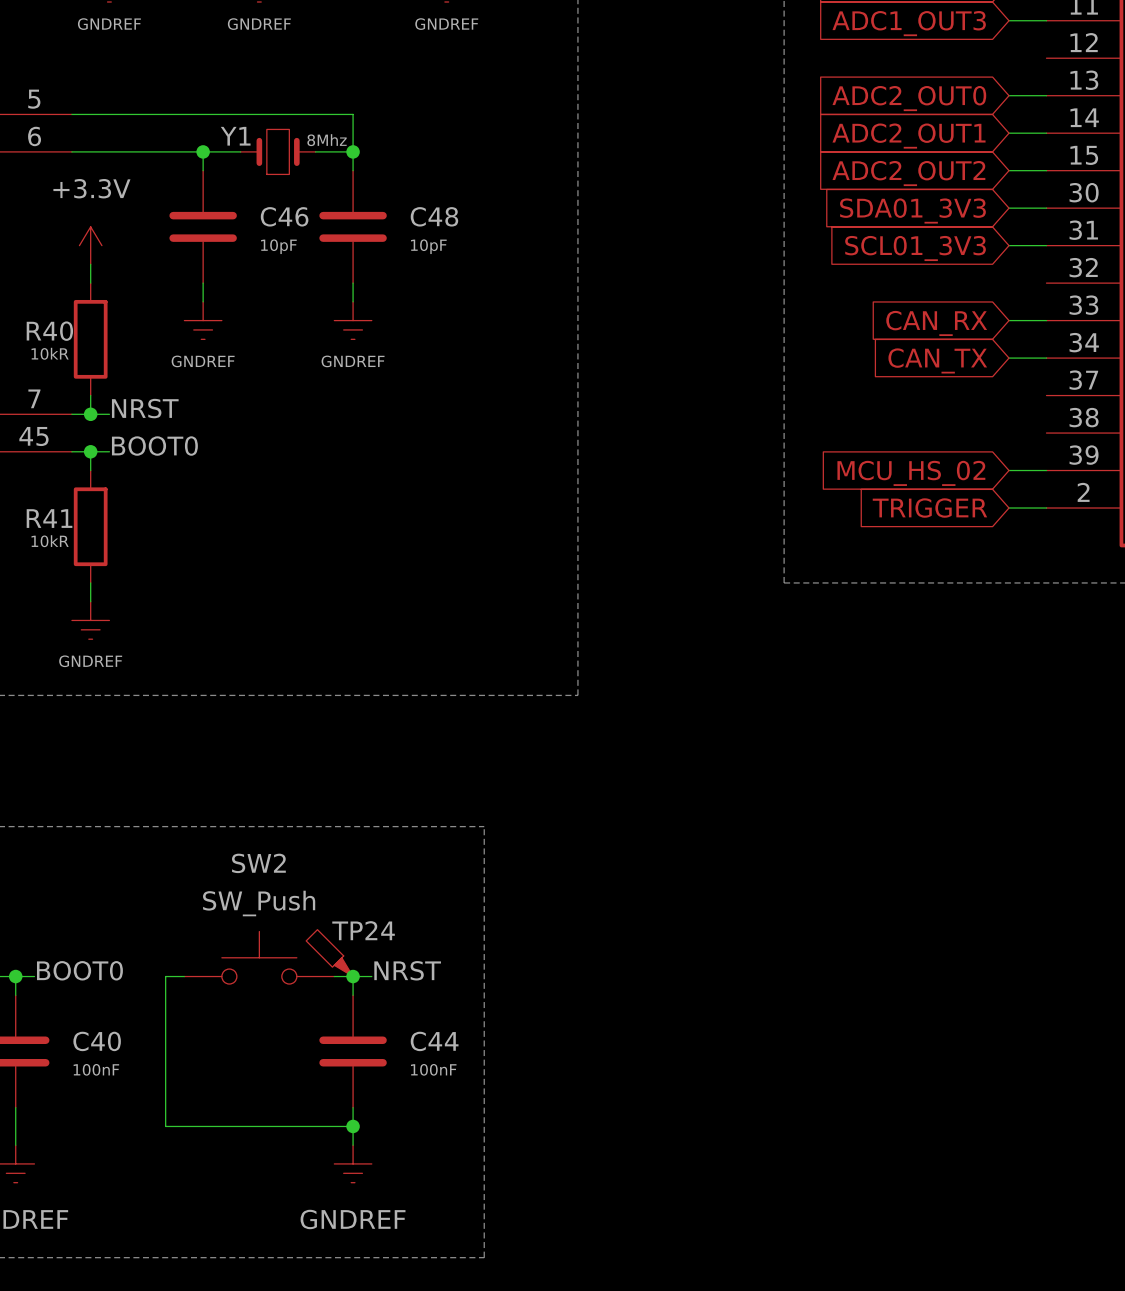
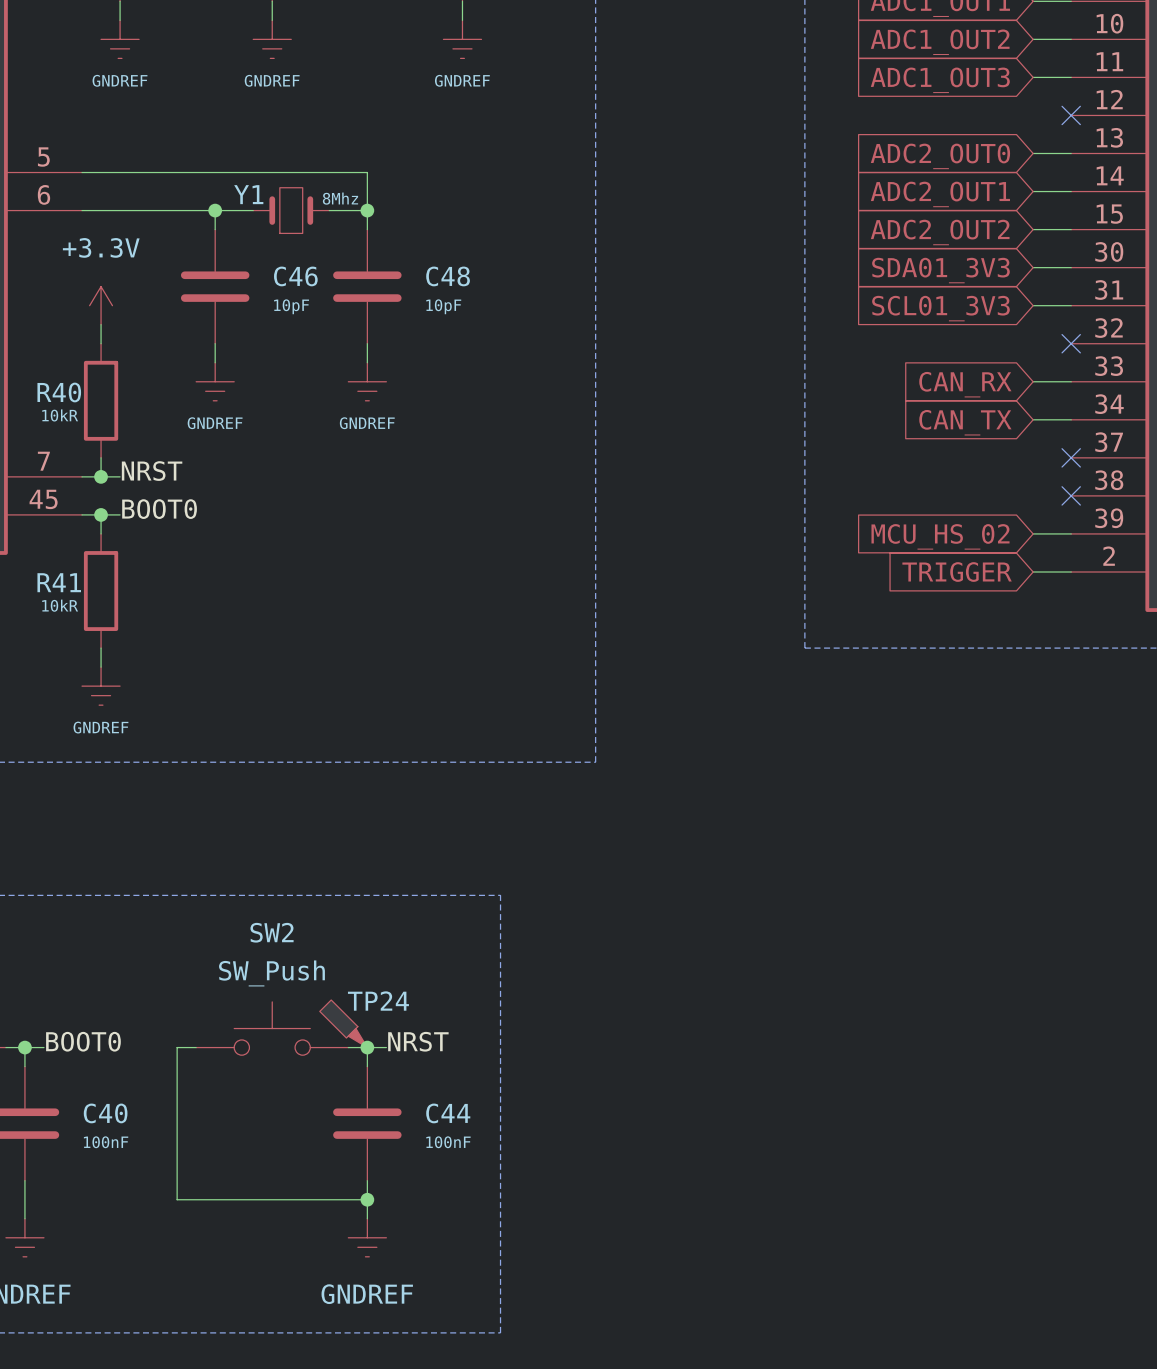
no-connect mark: none -> (1071, 115)
no-connect mark: none -> (1071, 343)
no-connect mark: none -> (1071, 457)
no-connect mark: none -> (1071, 495)

